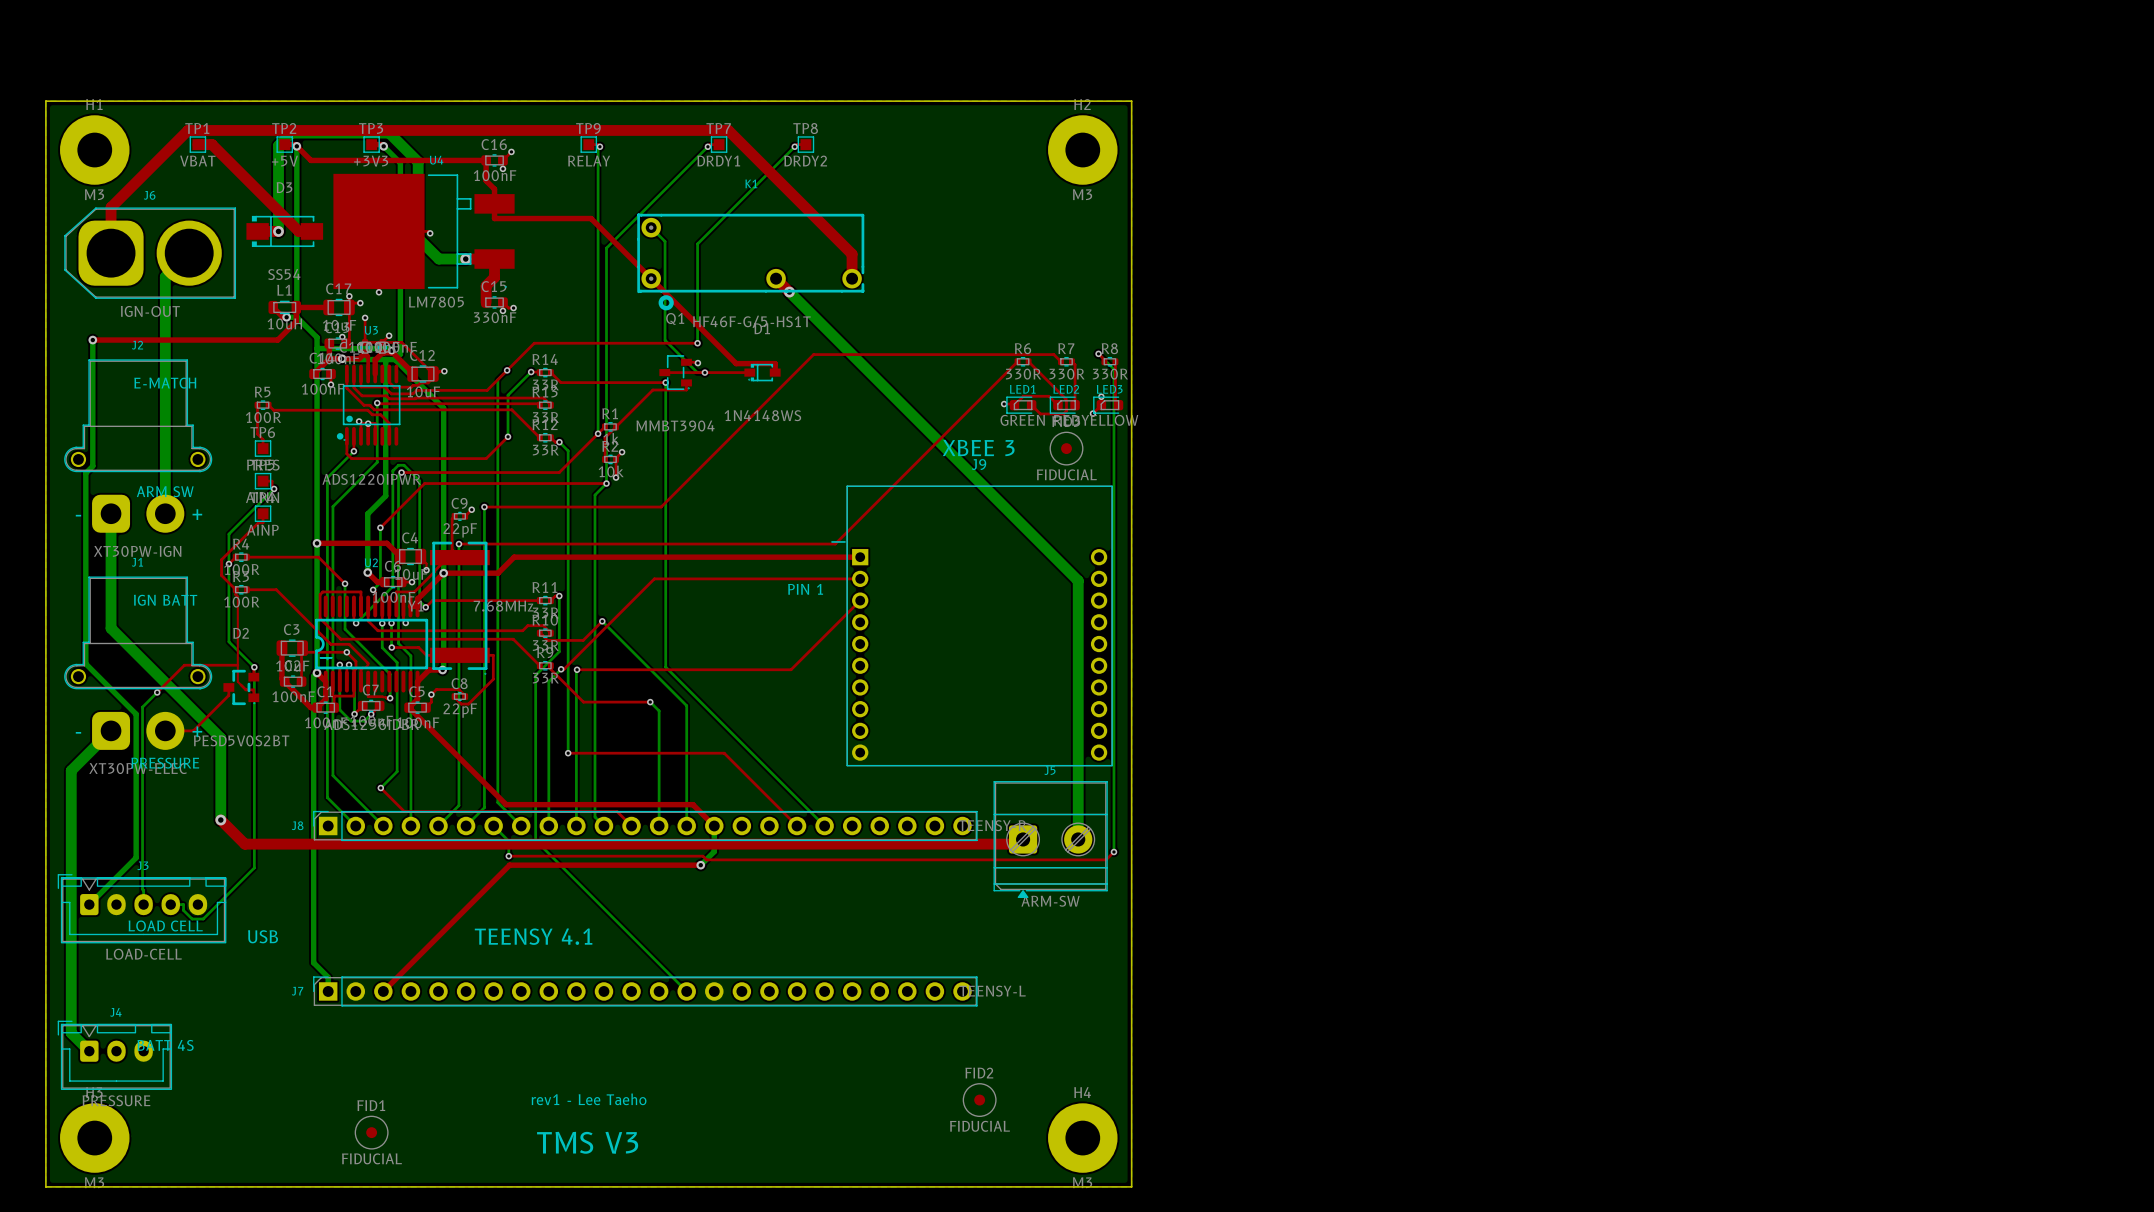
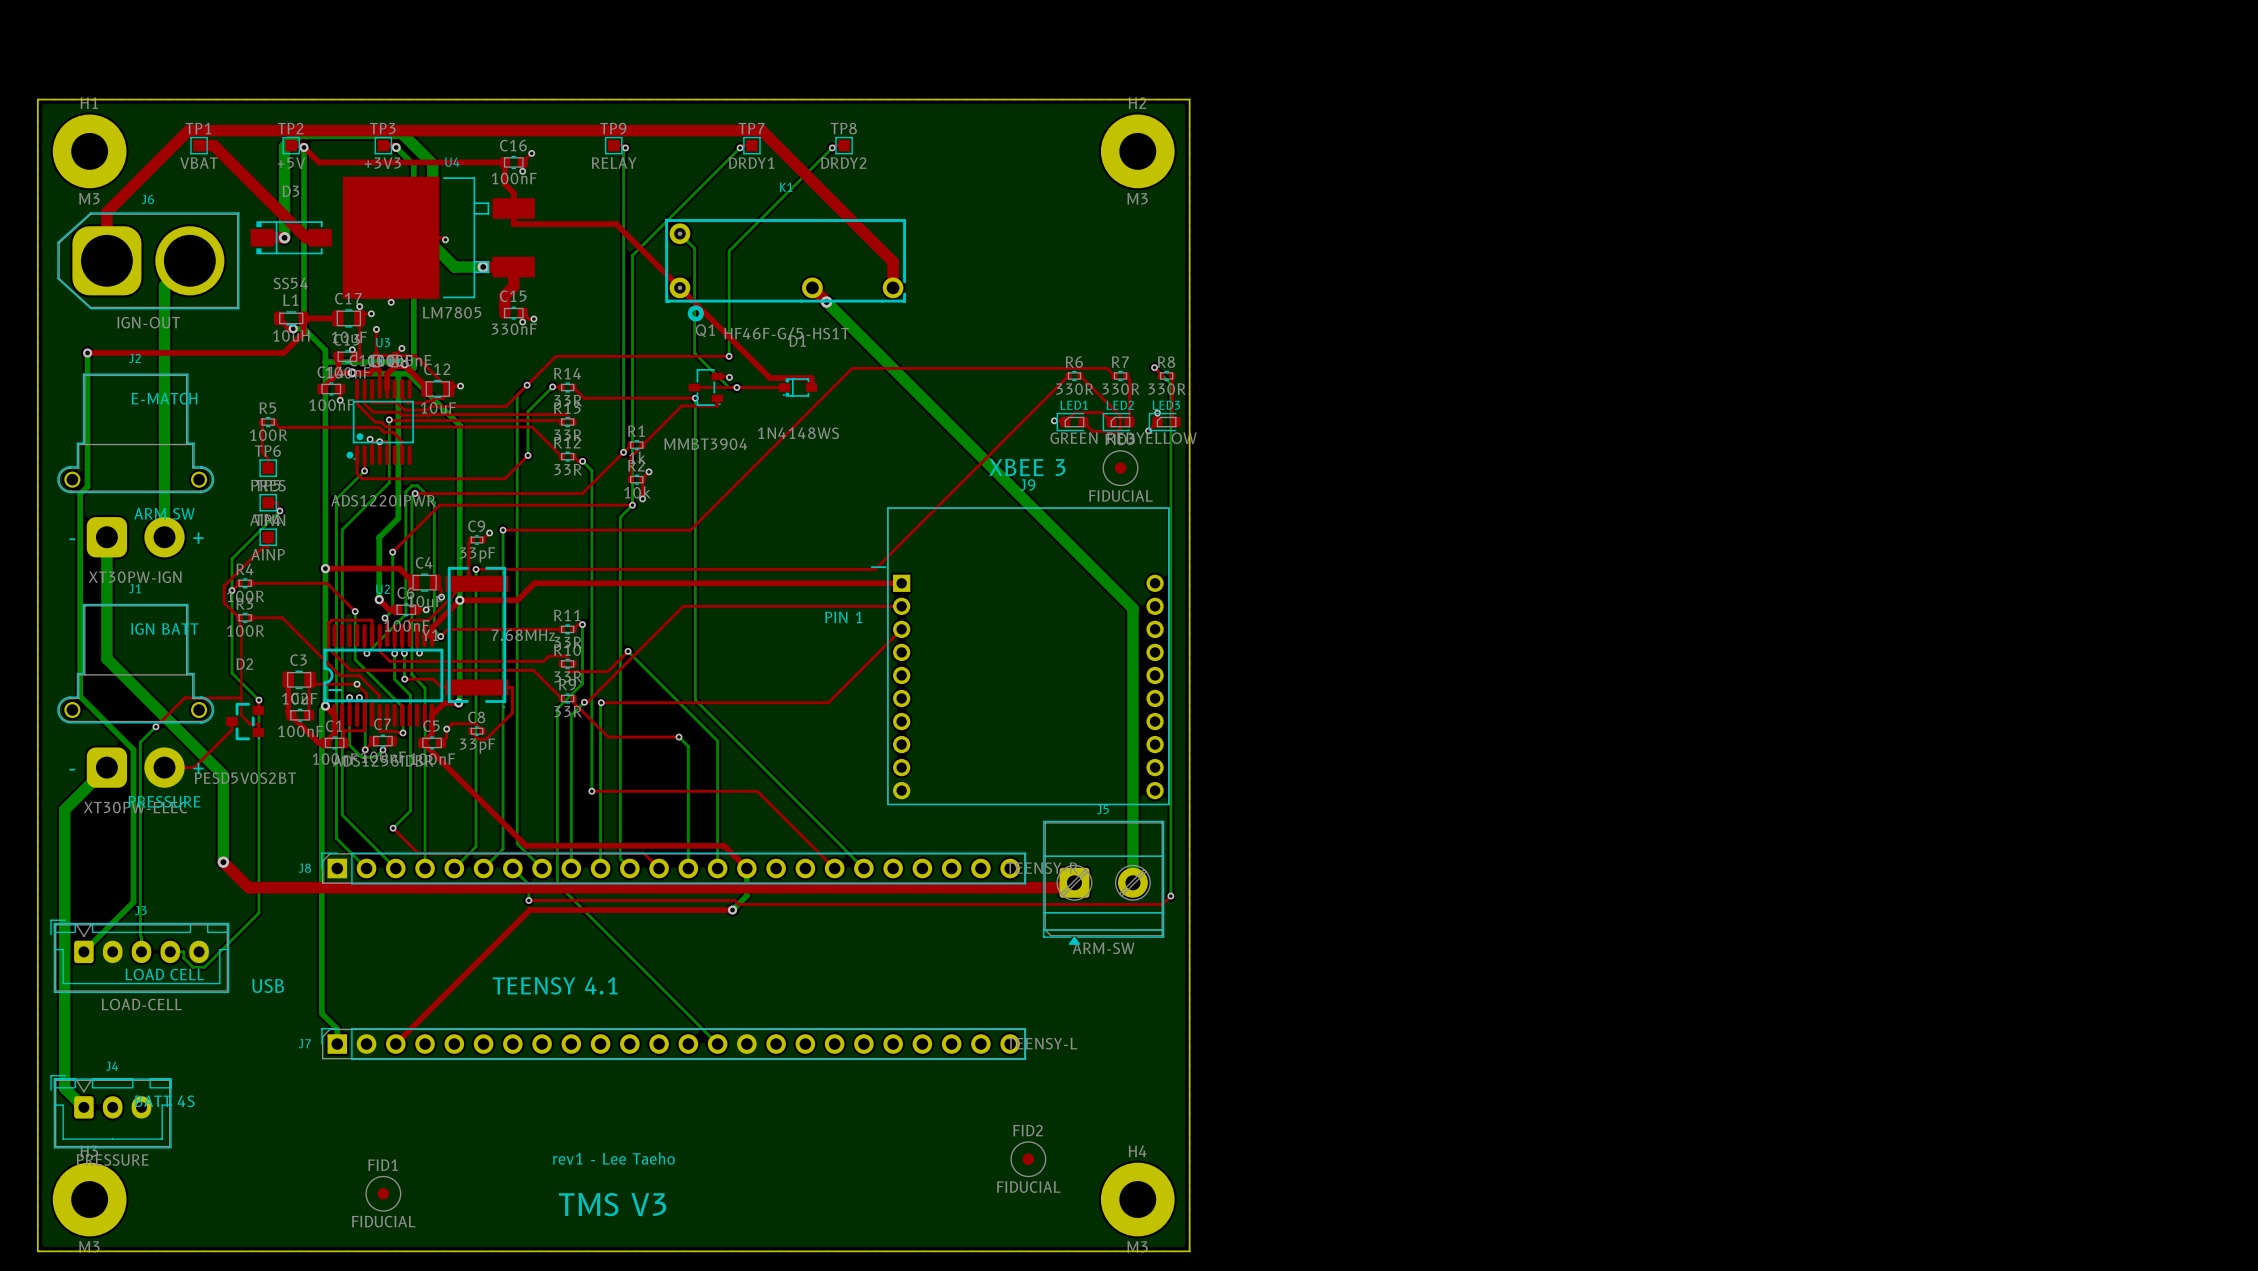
C9 value: 22pF (460, 530) -> 33pF (477, 554)
C8 value: 22pF (460, 710) -> 33pF (477, 746)

